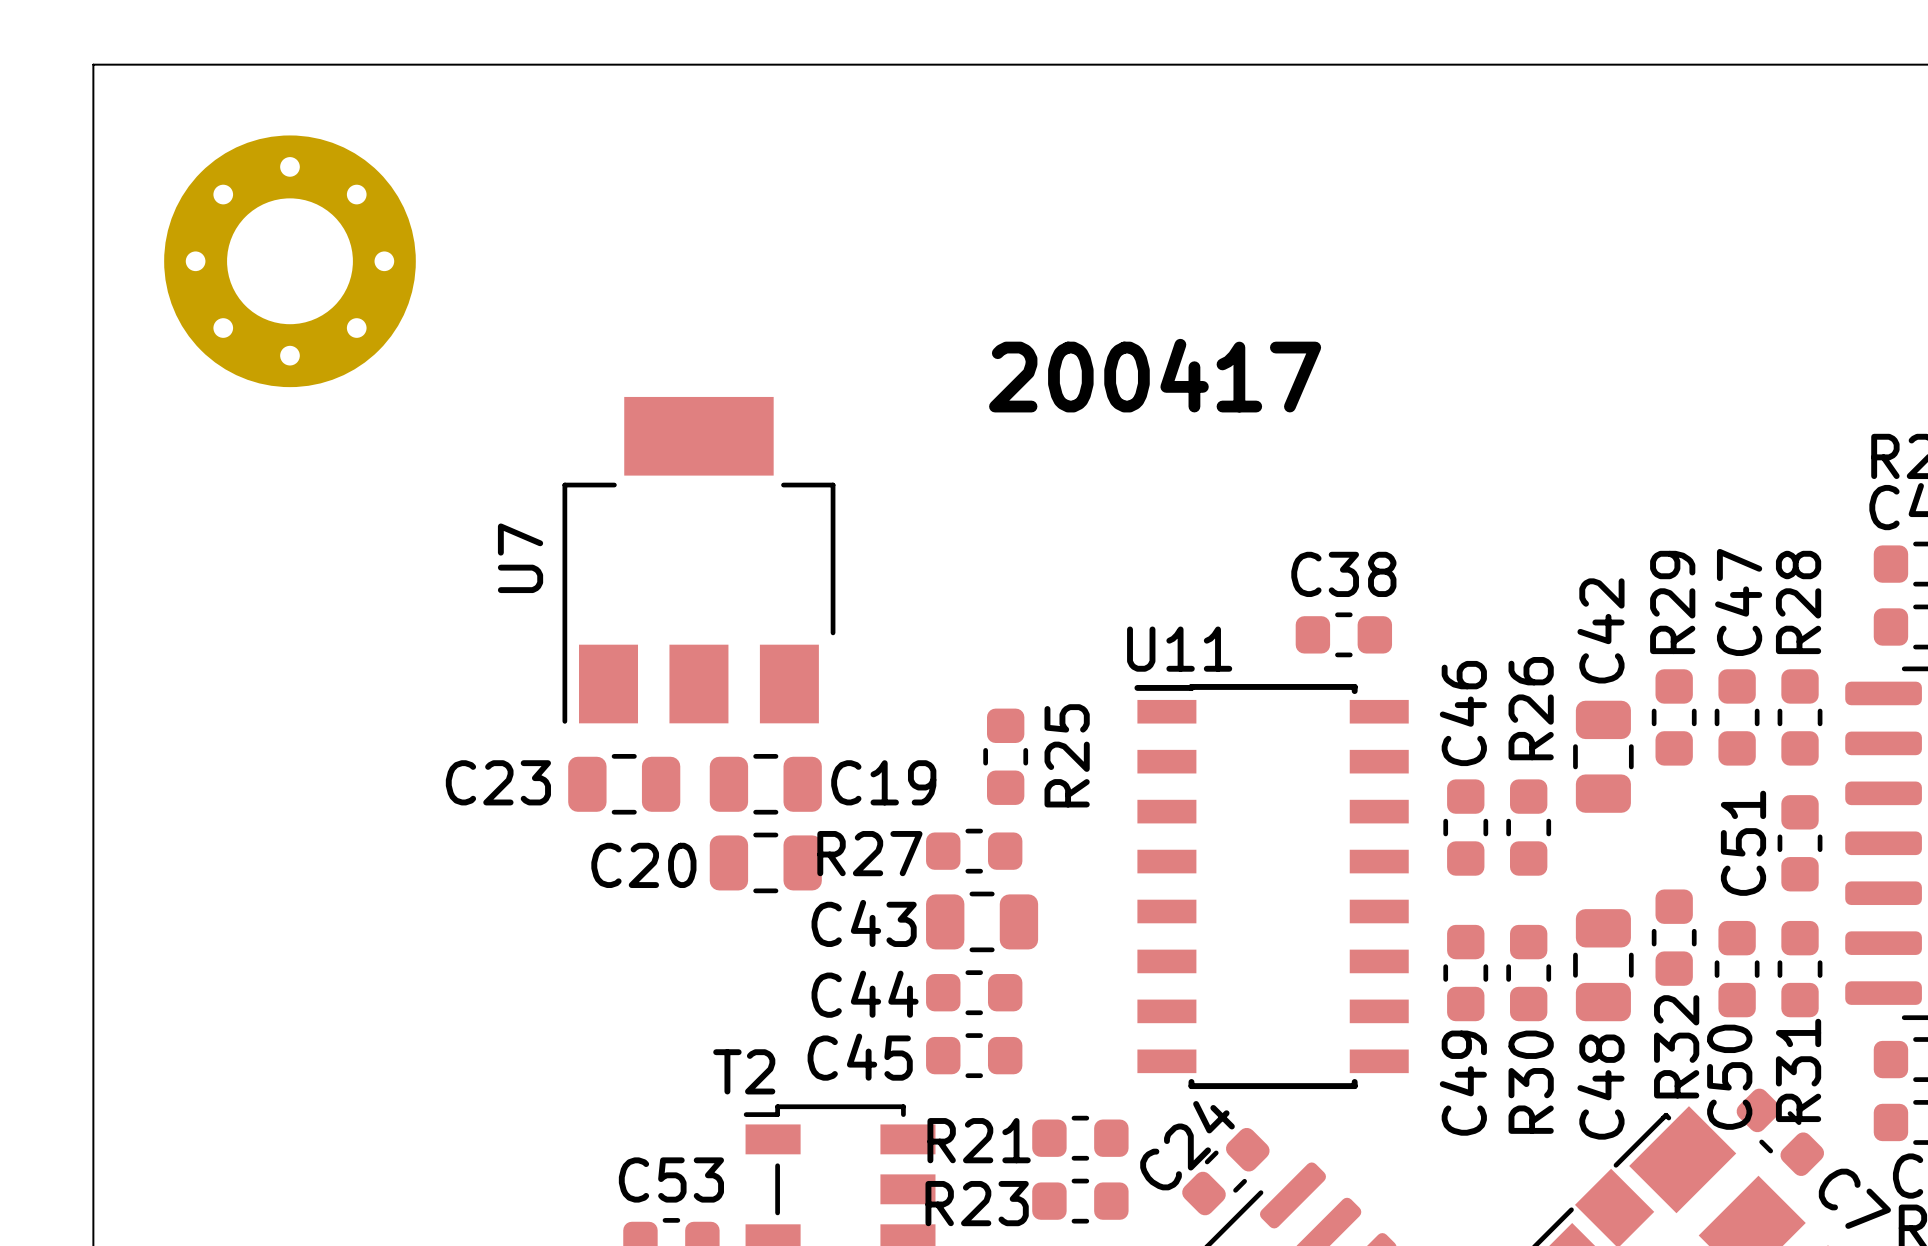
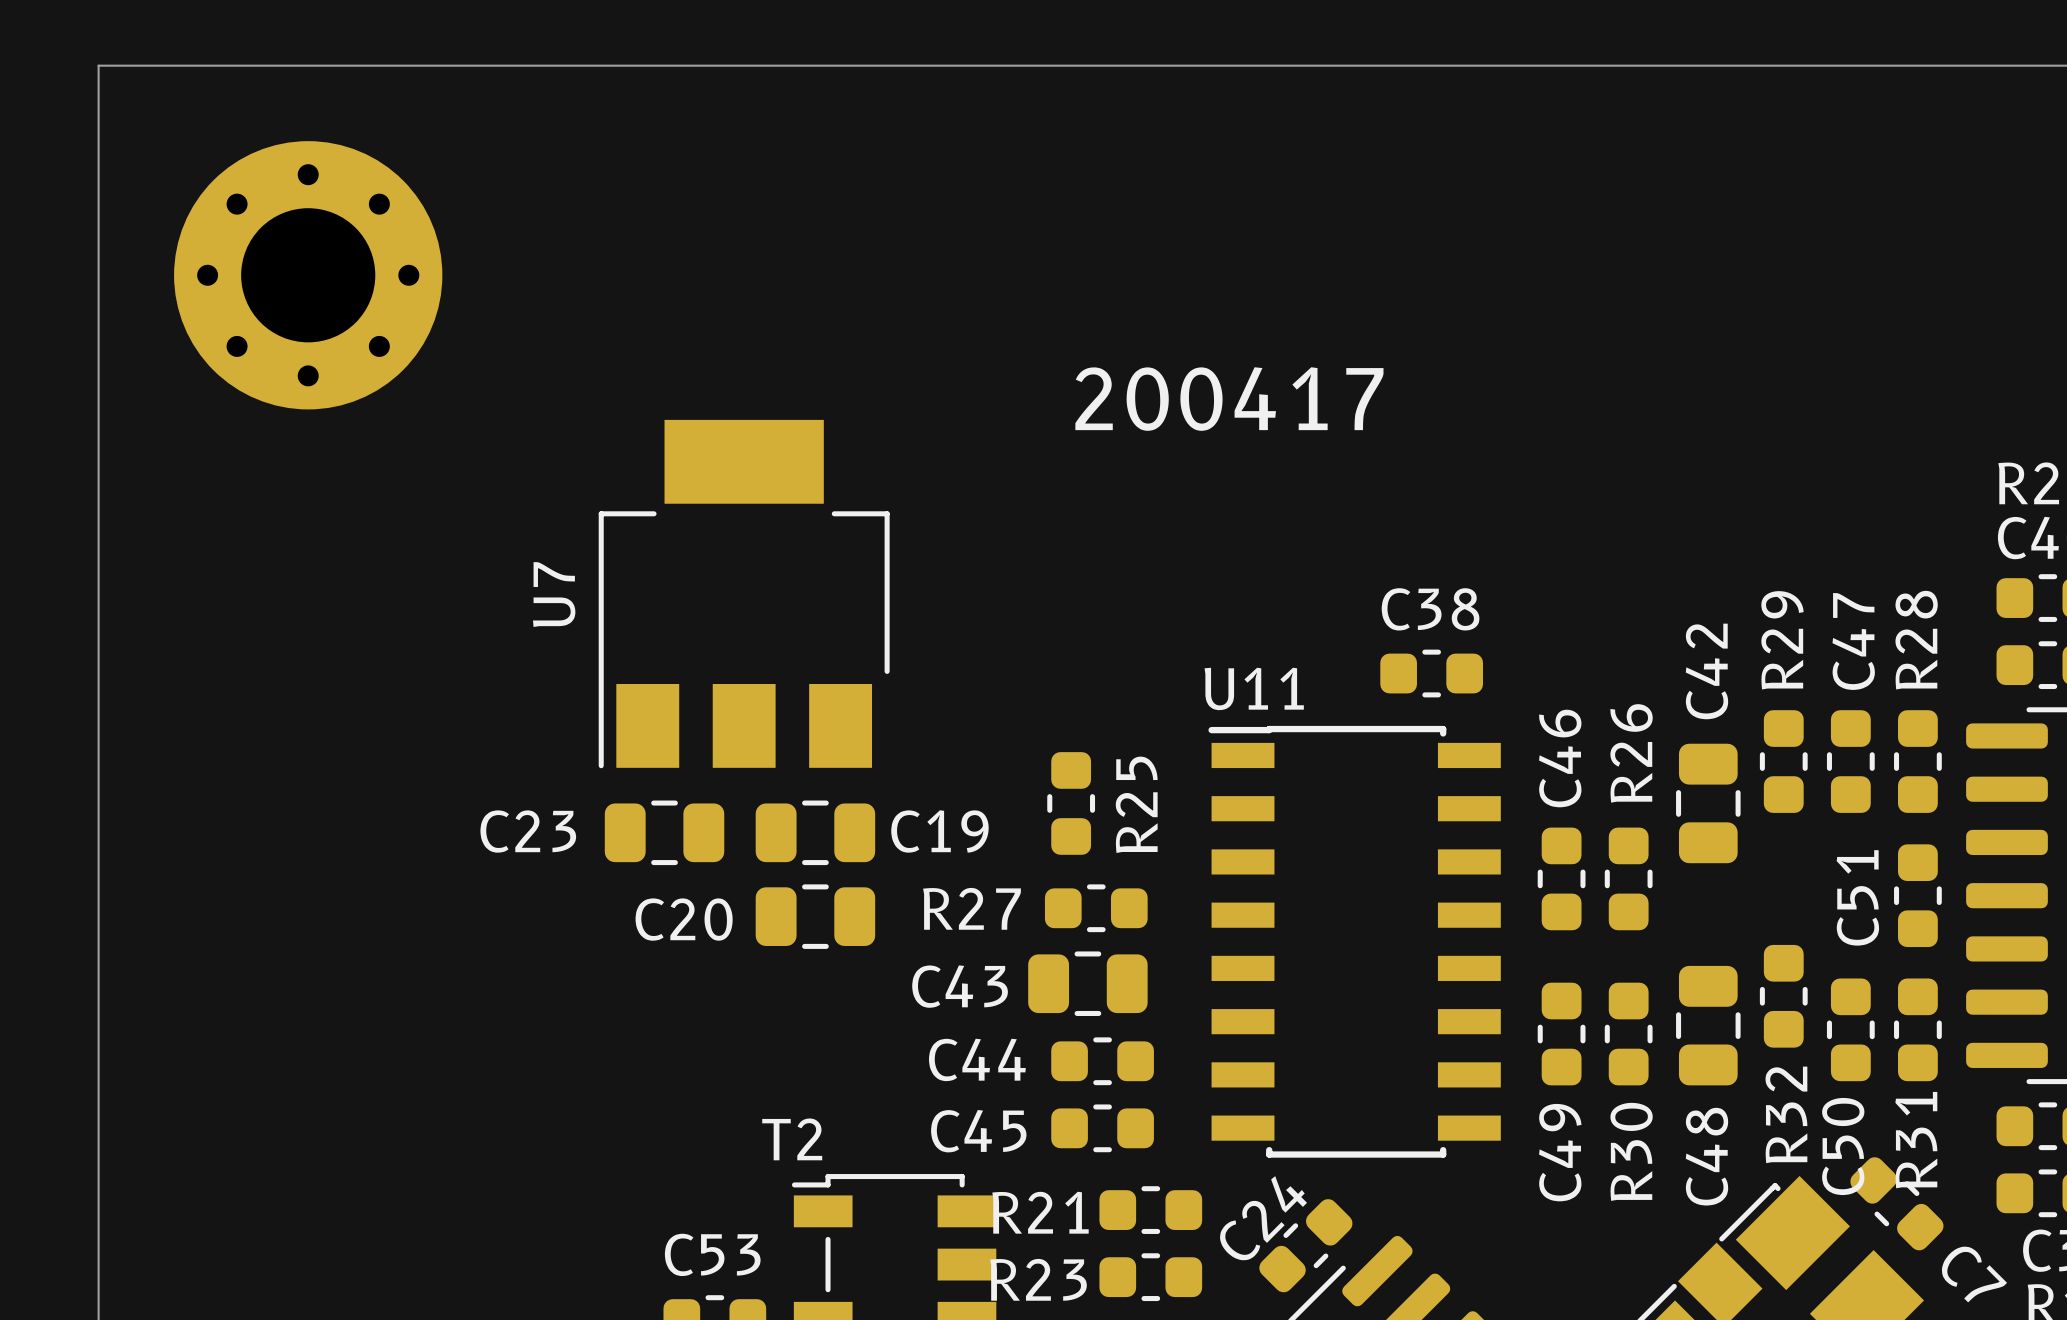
R27 position: (974, 851) -> (1096, 908)
R27 name position: R27 (869, 853) -> R27 (972, 908)
C43 position: (982, 921) -> (1087, 983)
C44 position: (974, 992) -> (1102, 1061)
C44 name position: C44 (865, 994) -> C44 (977, 1059)
C45 position: (974, 1055) -> (1102, 1128)

